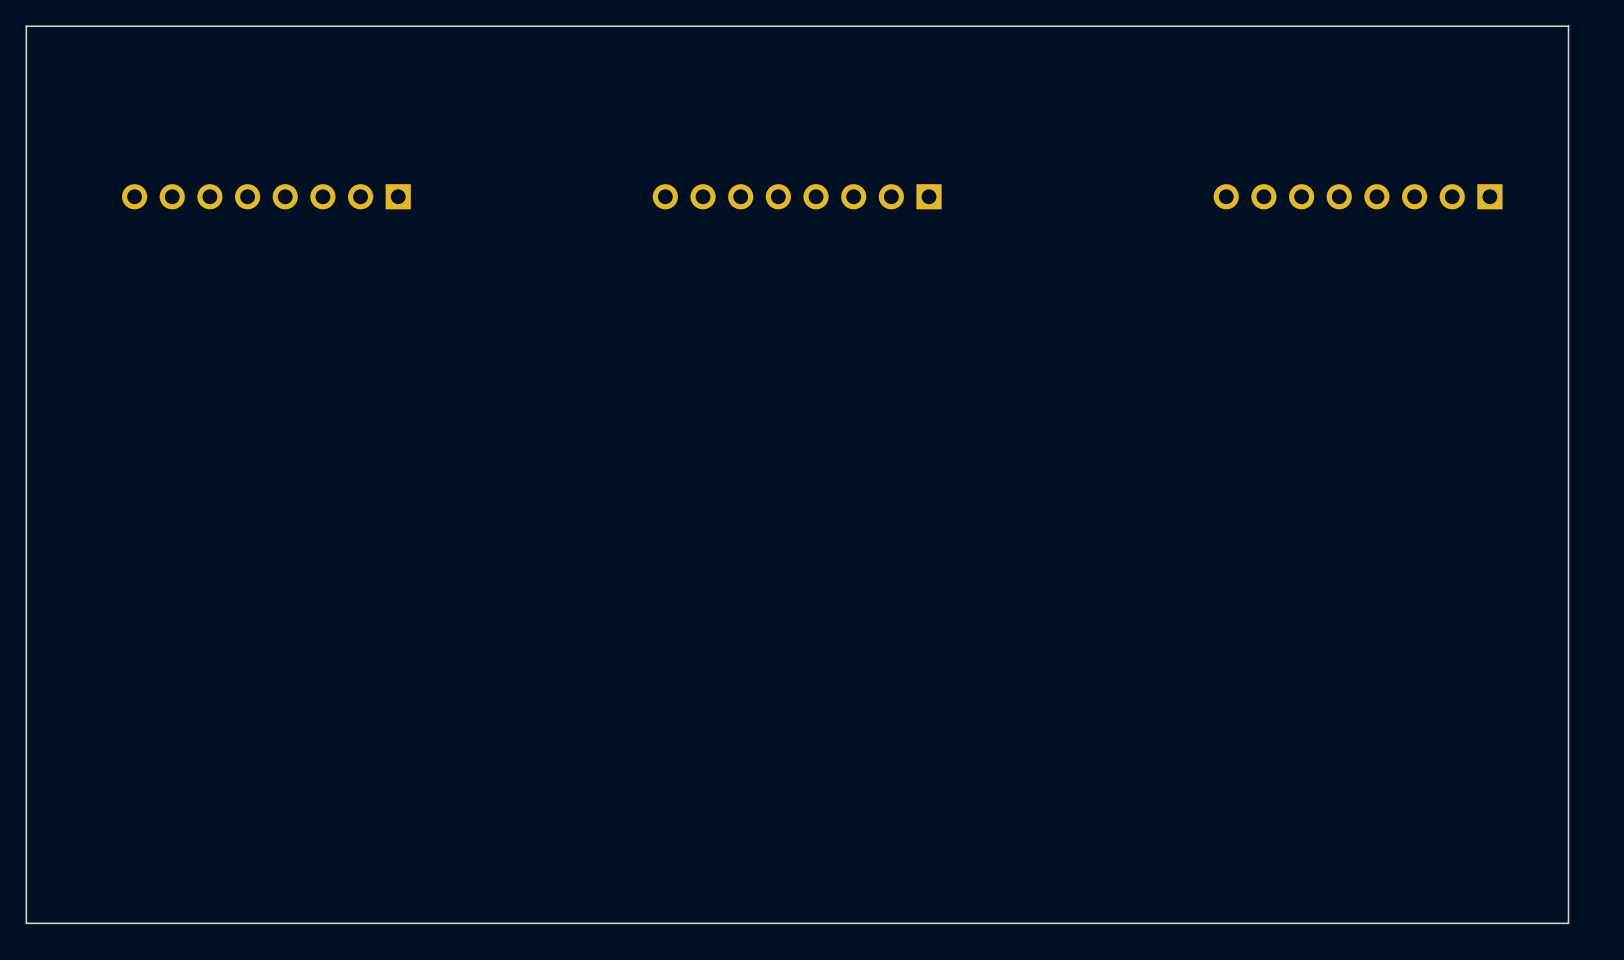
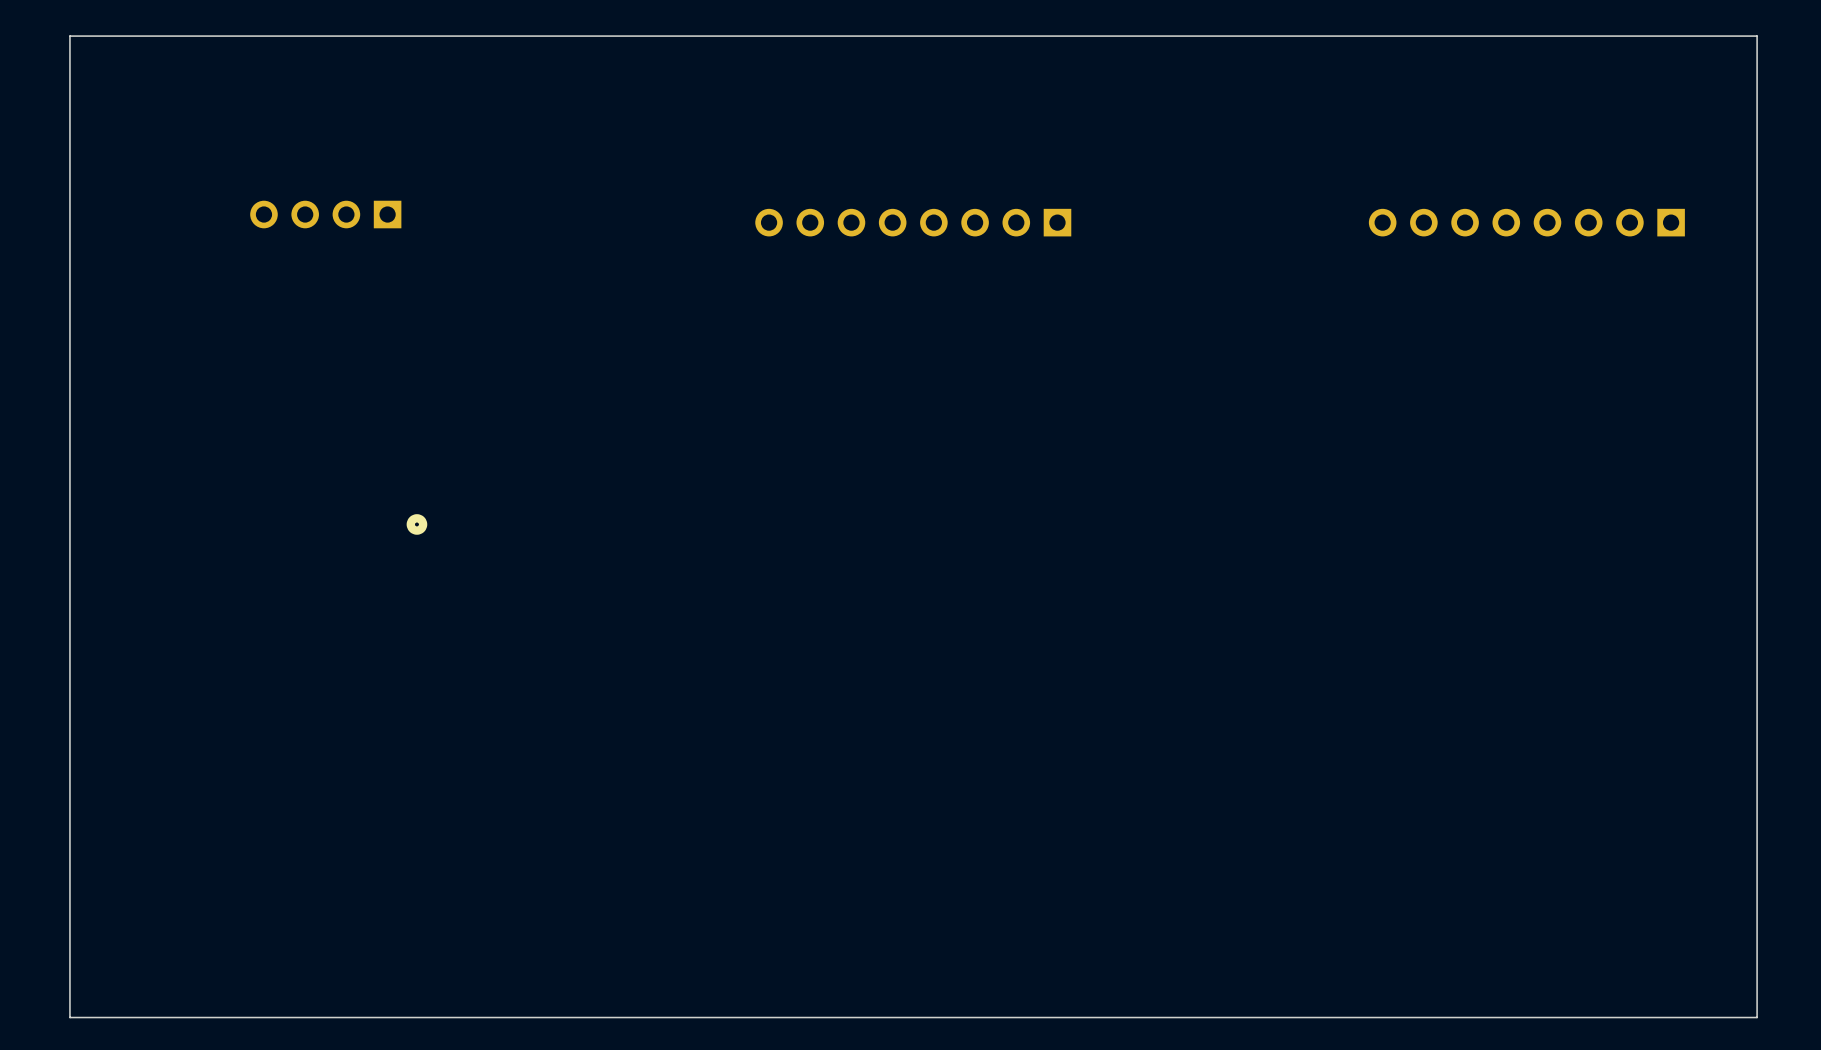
part footprint: [121, 184, 411, 210] -> [250, 200, 402, 229]
part: none -> (416, 524)

